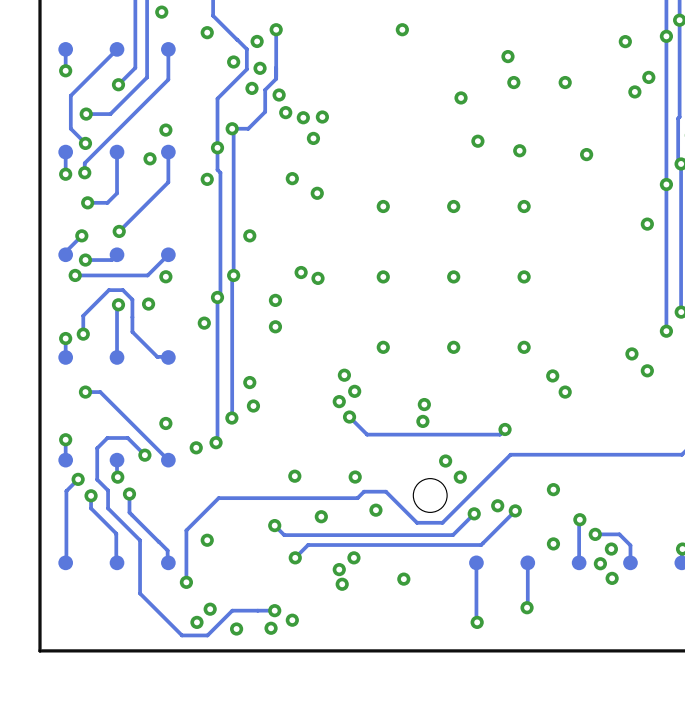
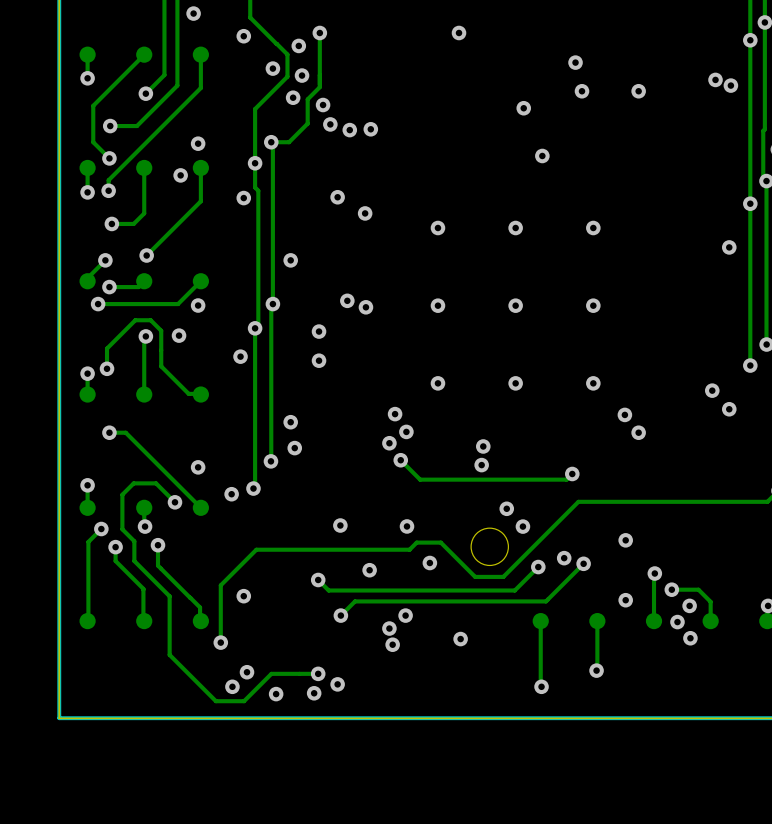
via: (625, 41) -> none
via: none -> (715, 79)
via: (634, 91) -> none
via: (313, 138) -> none
via: (519, 150) -> none
via: (586, 154) -> none

